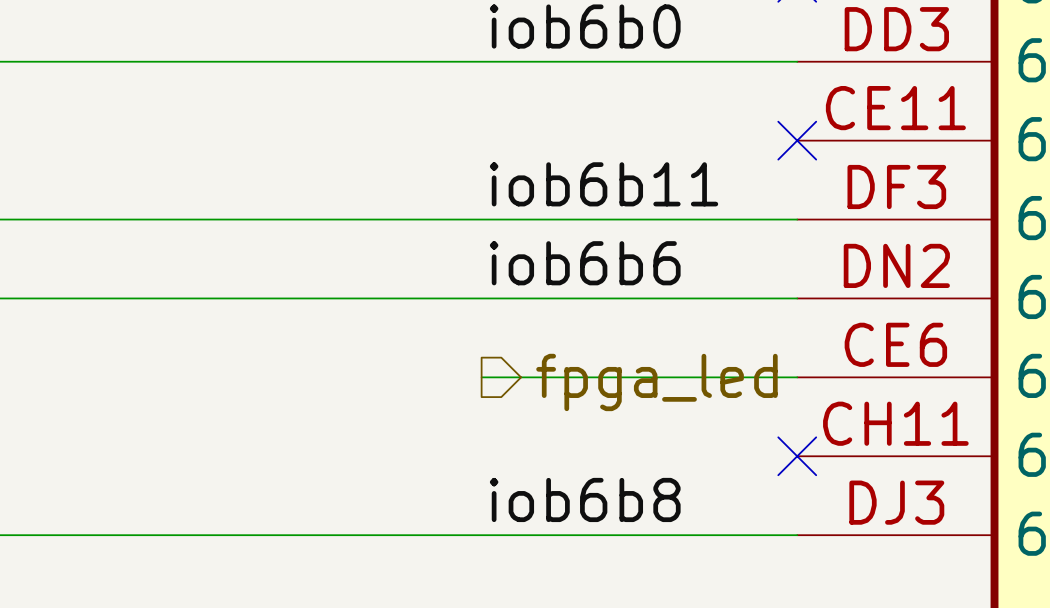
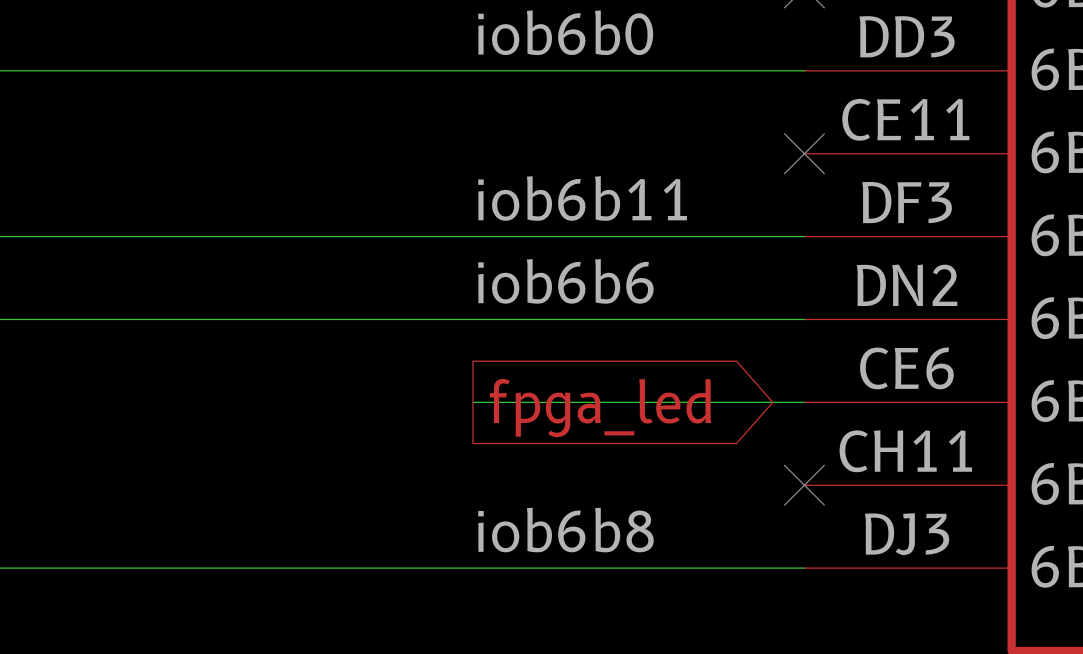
hierarchical label: fpga_led (656, 382) -> none
global label: none -> fpga_led (600, 408)

